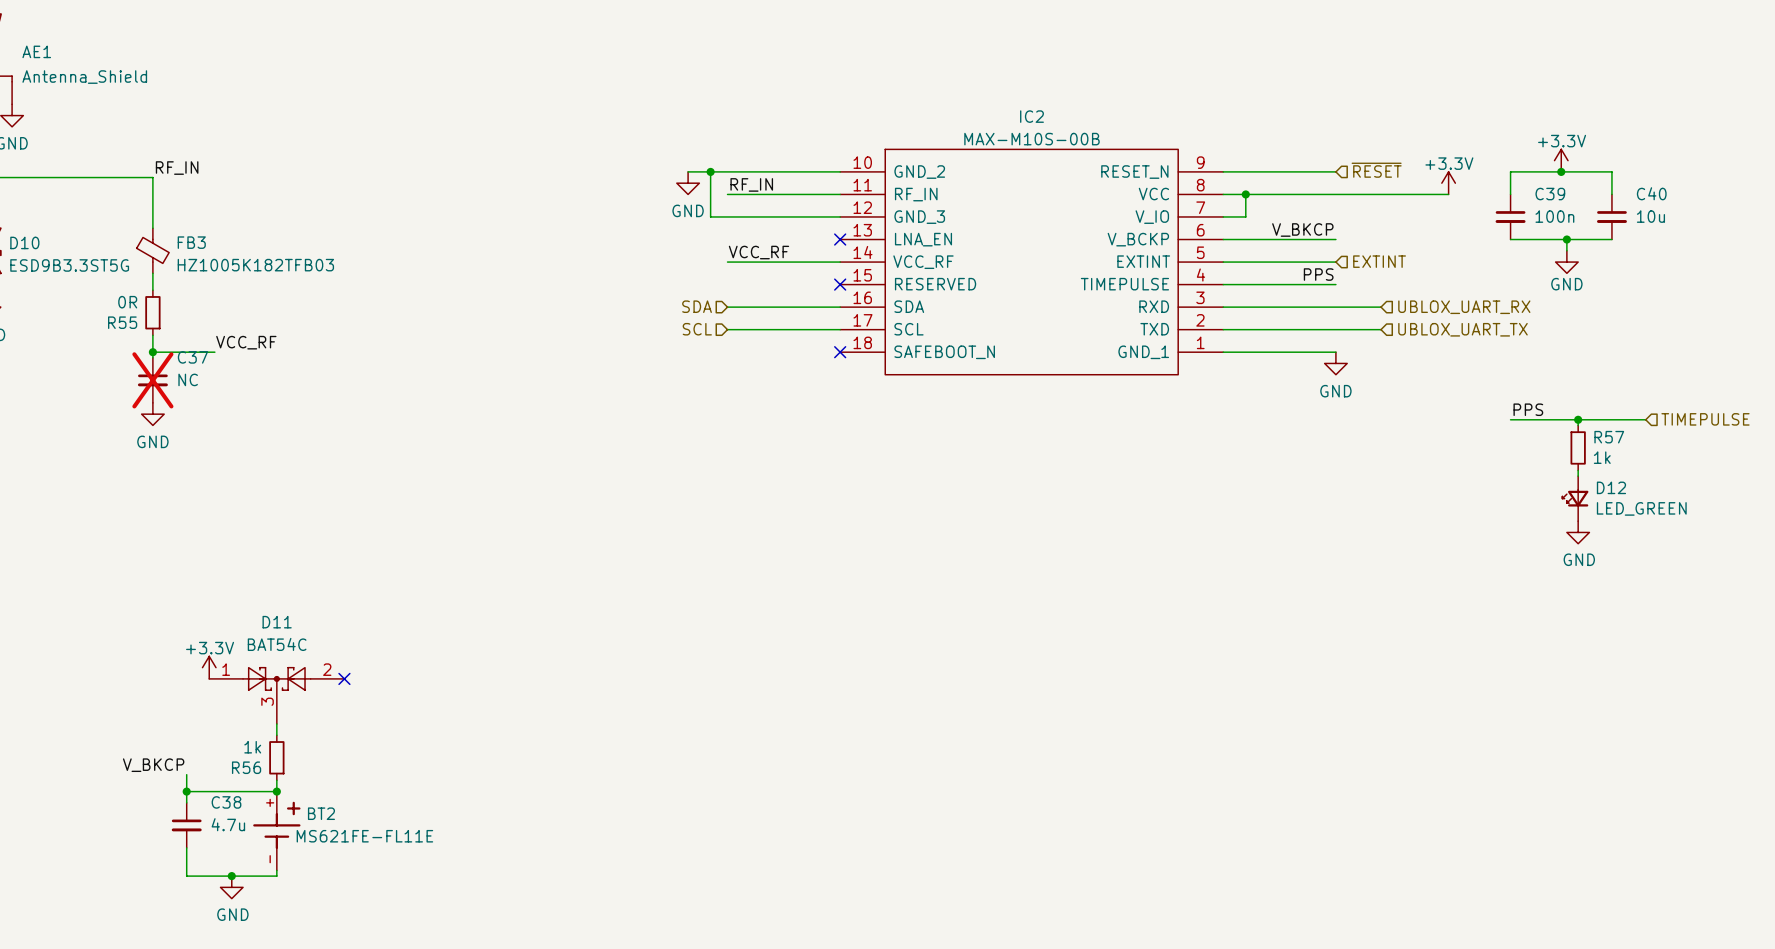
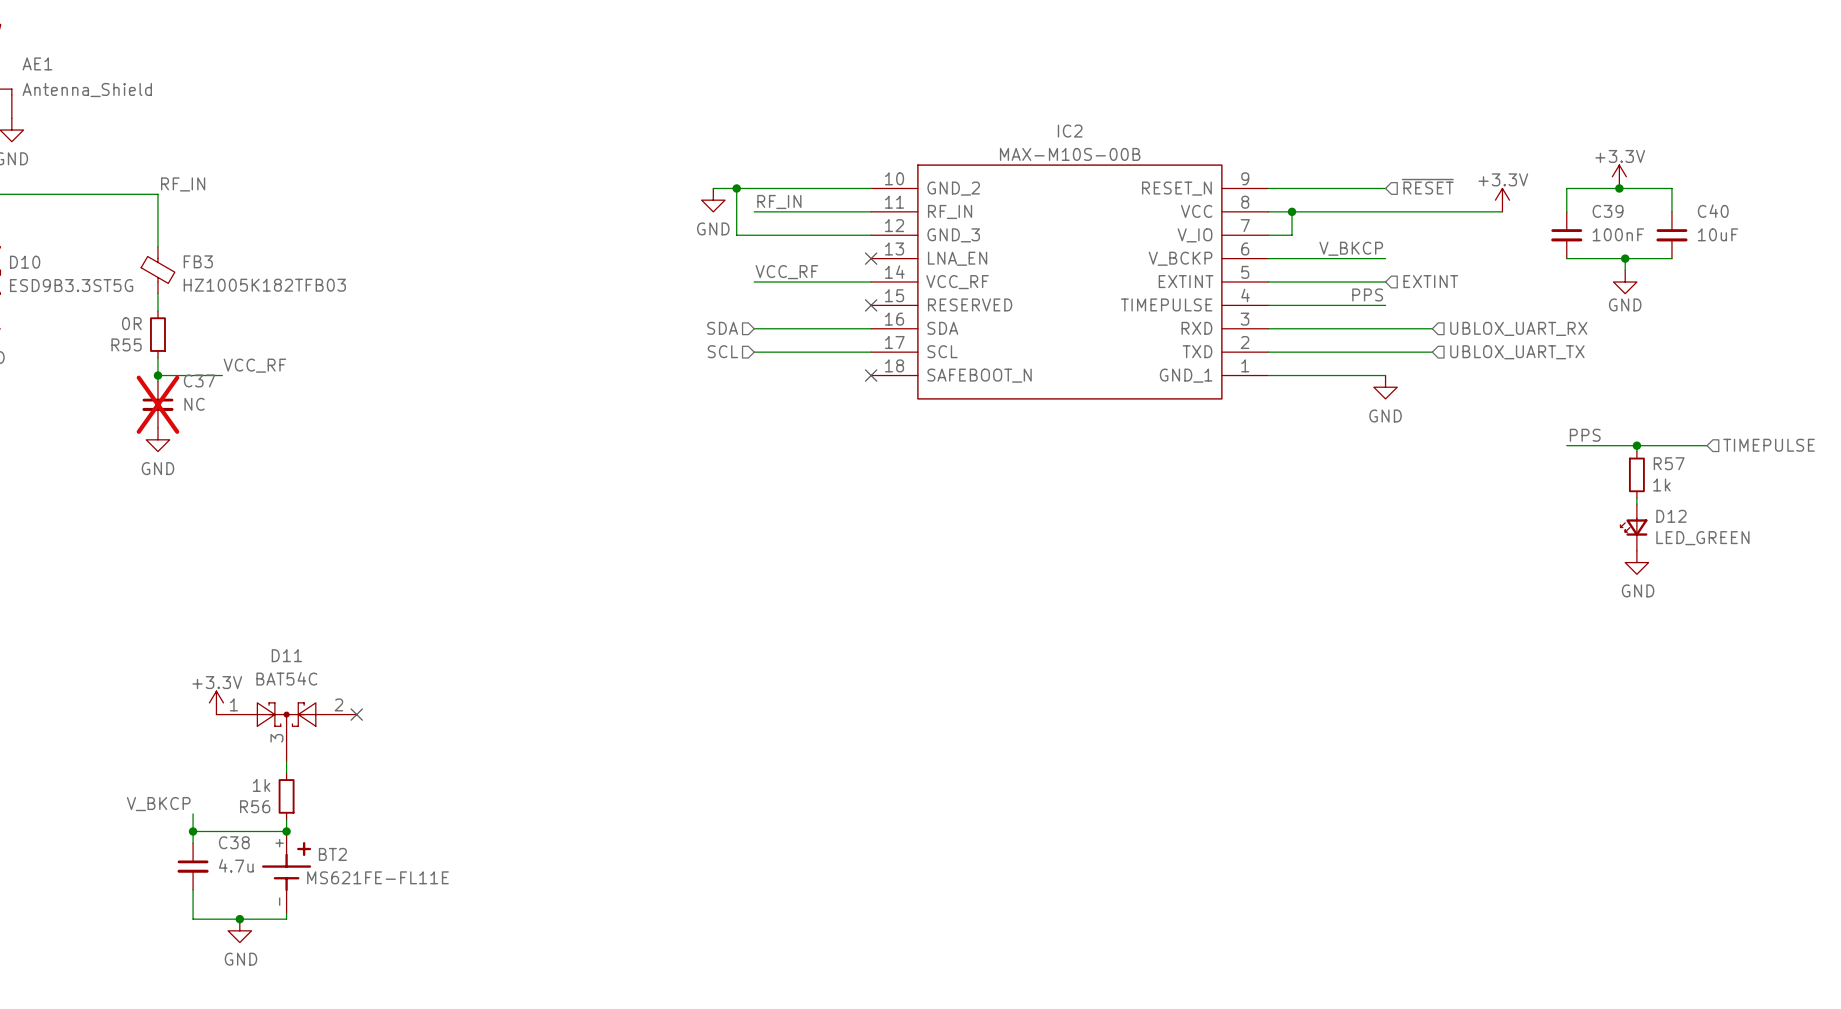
C39 value: 100n (1554, 216) -> 100nF (1618, 234)
C40 value: 10u (1650, 216) -> 10uF (1718, 234)

